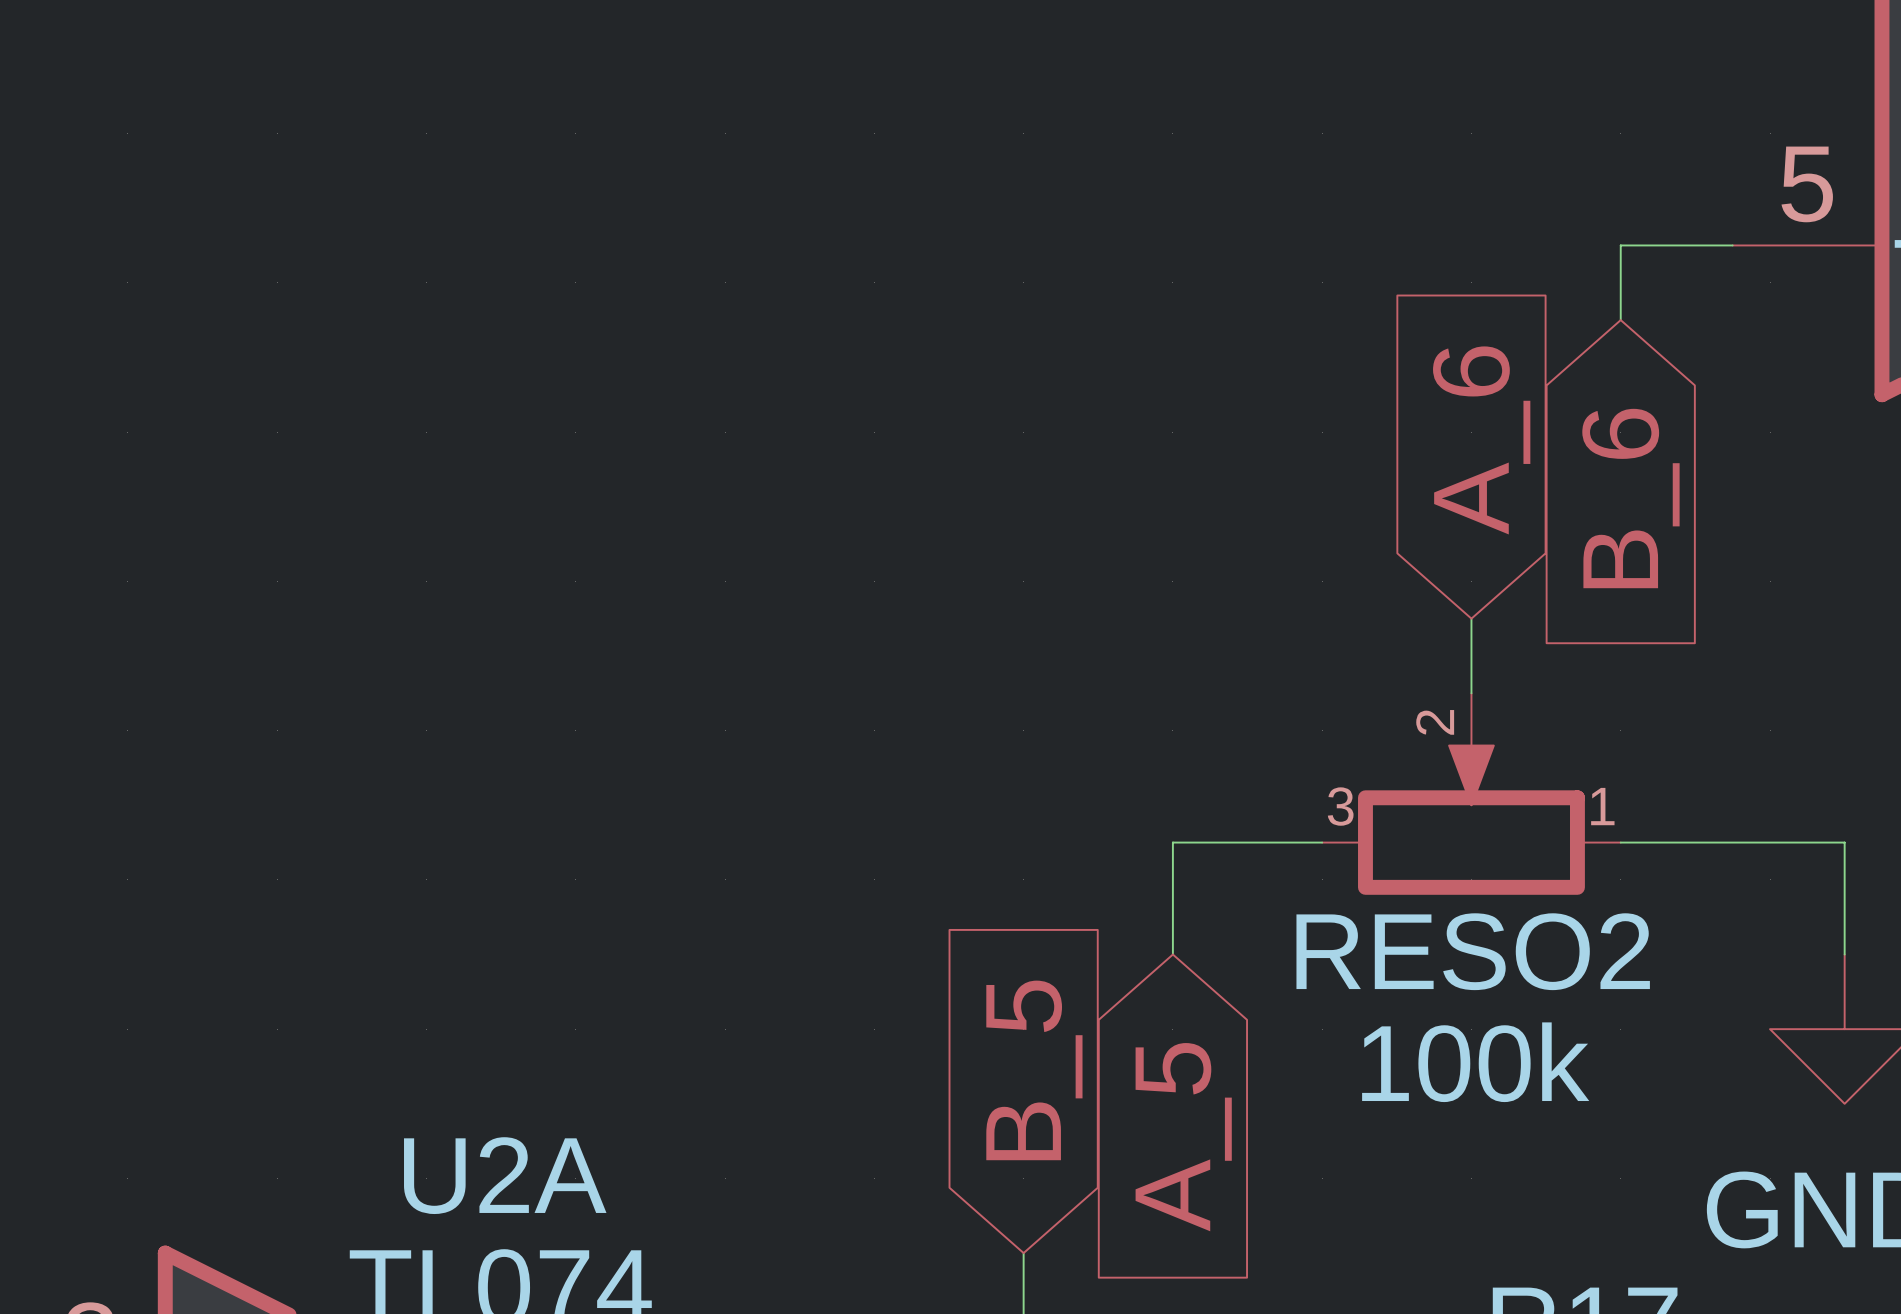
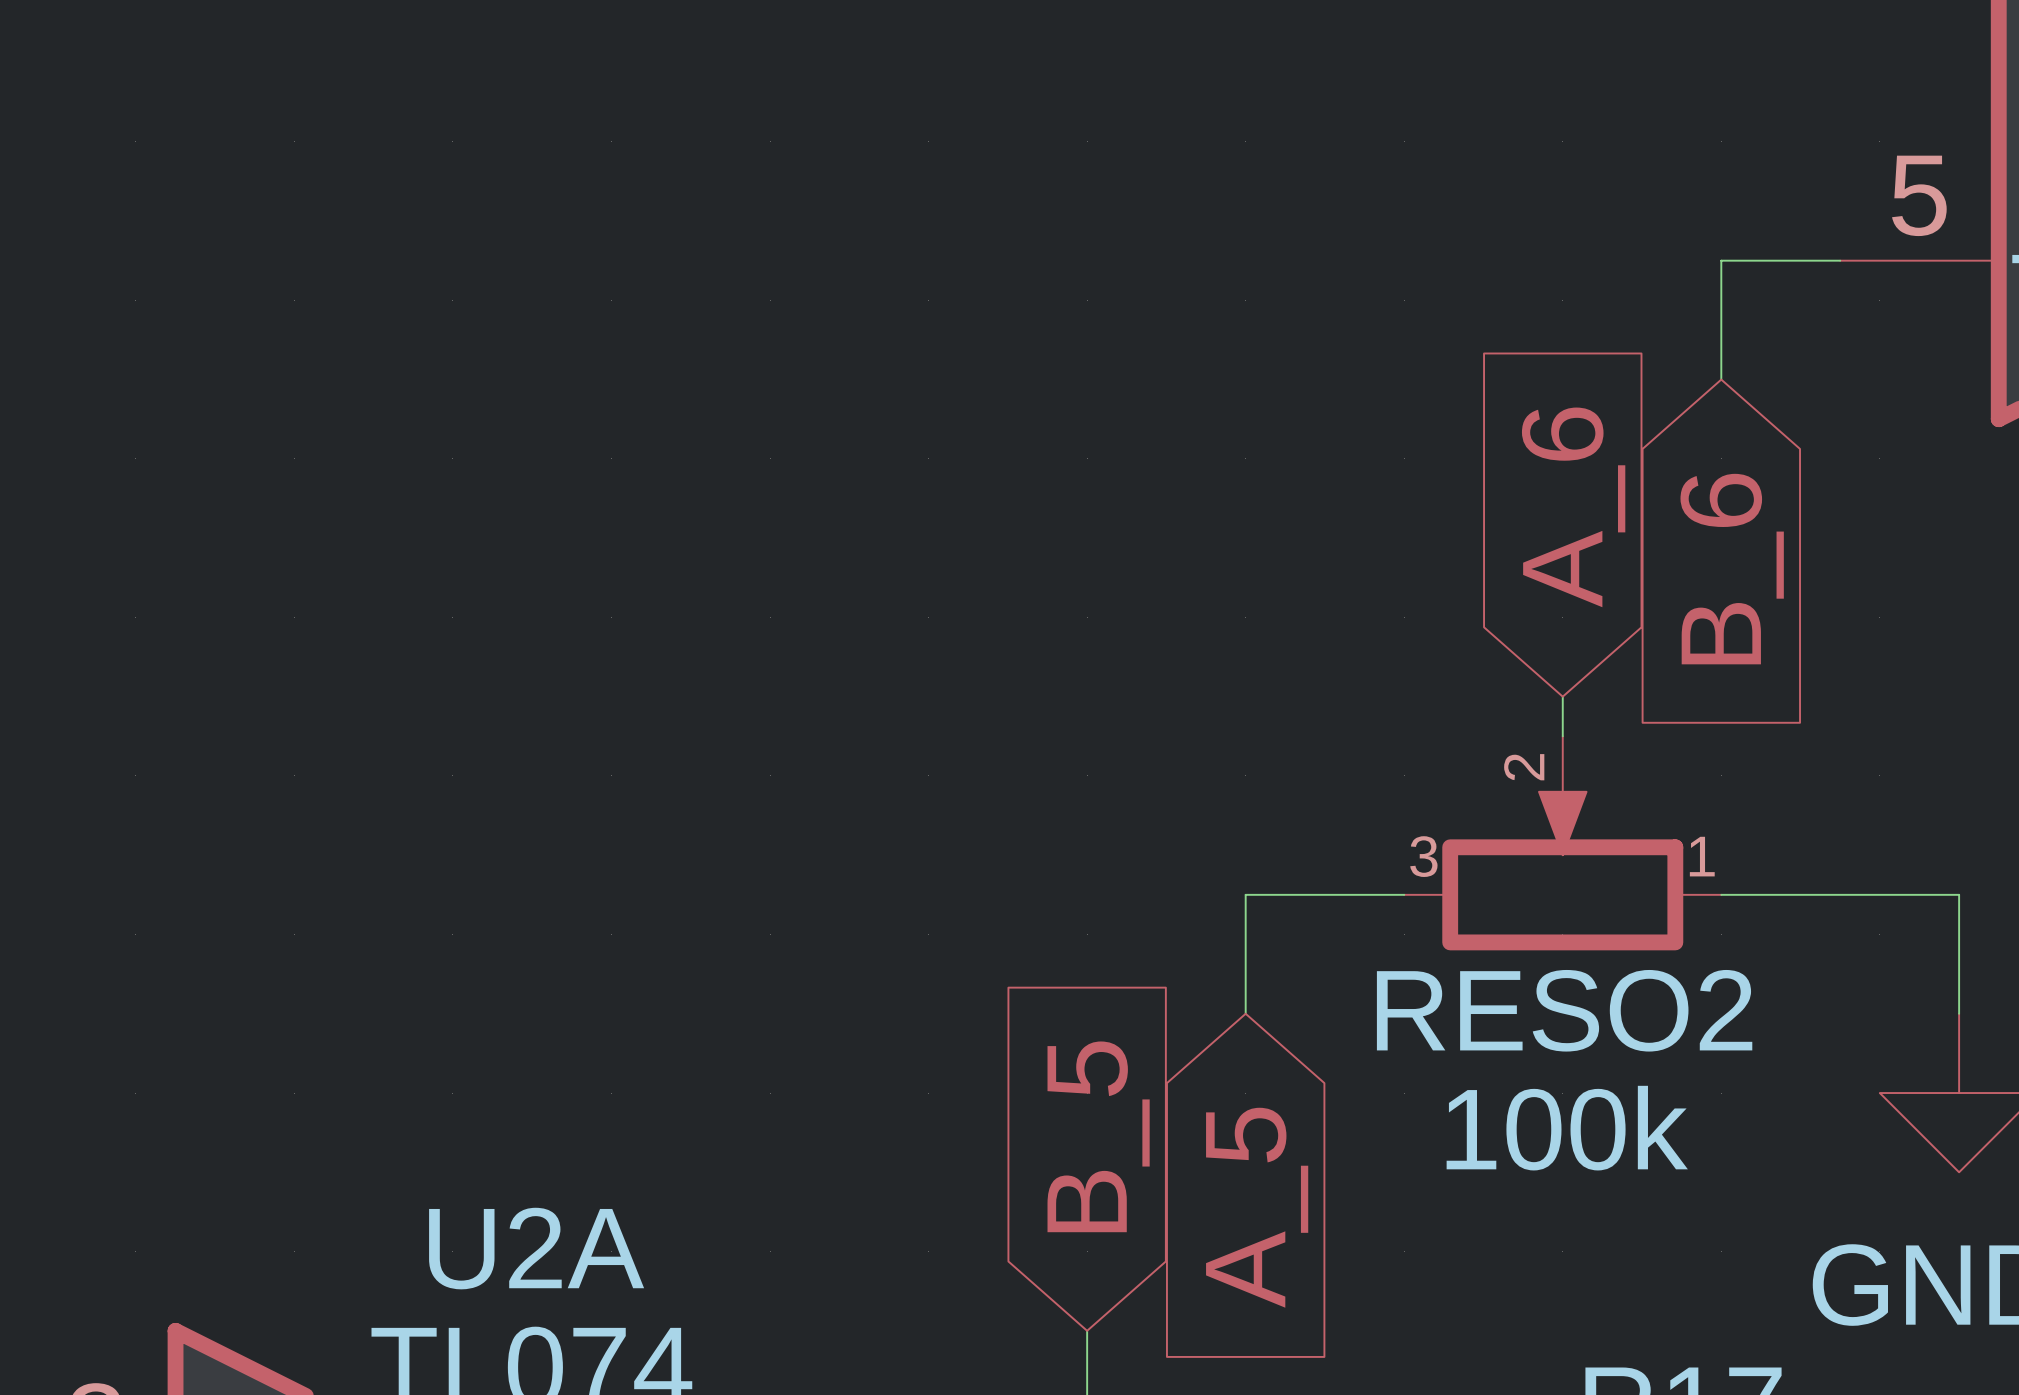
global label position: A_6 (1481, 440) -> A_6 (1573, 507)
global label position: B_6 (1630, 498) -> B_6 (1732, 569)
wire: (1471, 618) (1471, 655) -> (1721, 339) (1721, 379)

